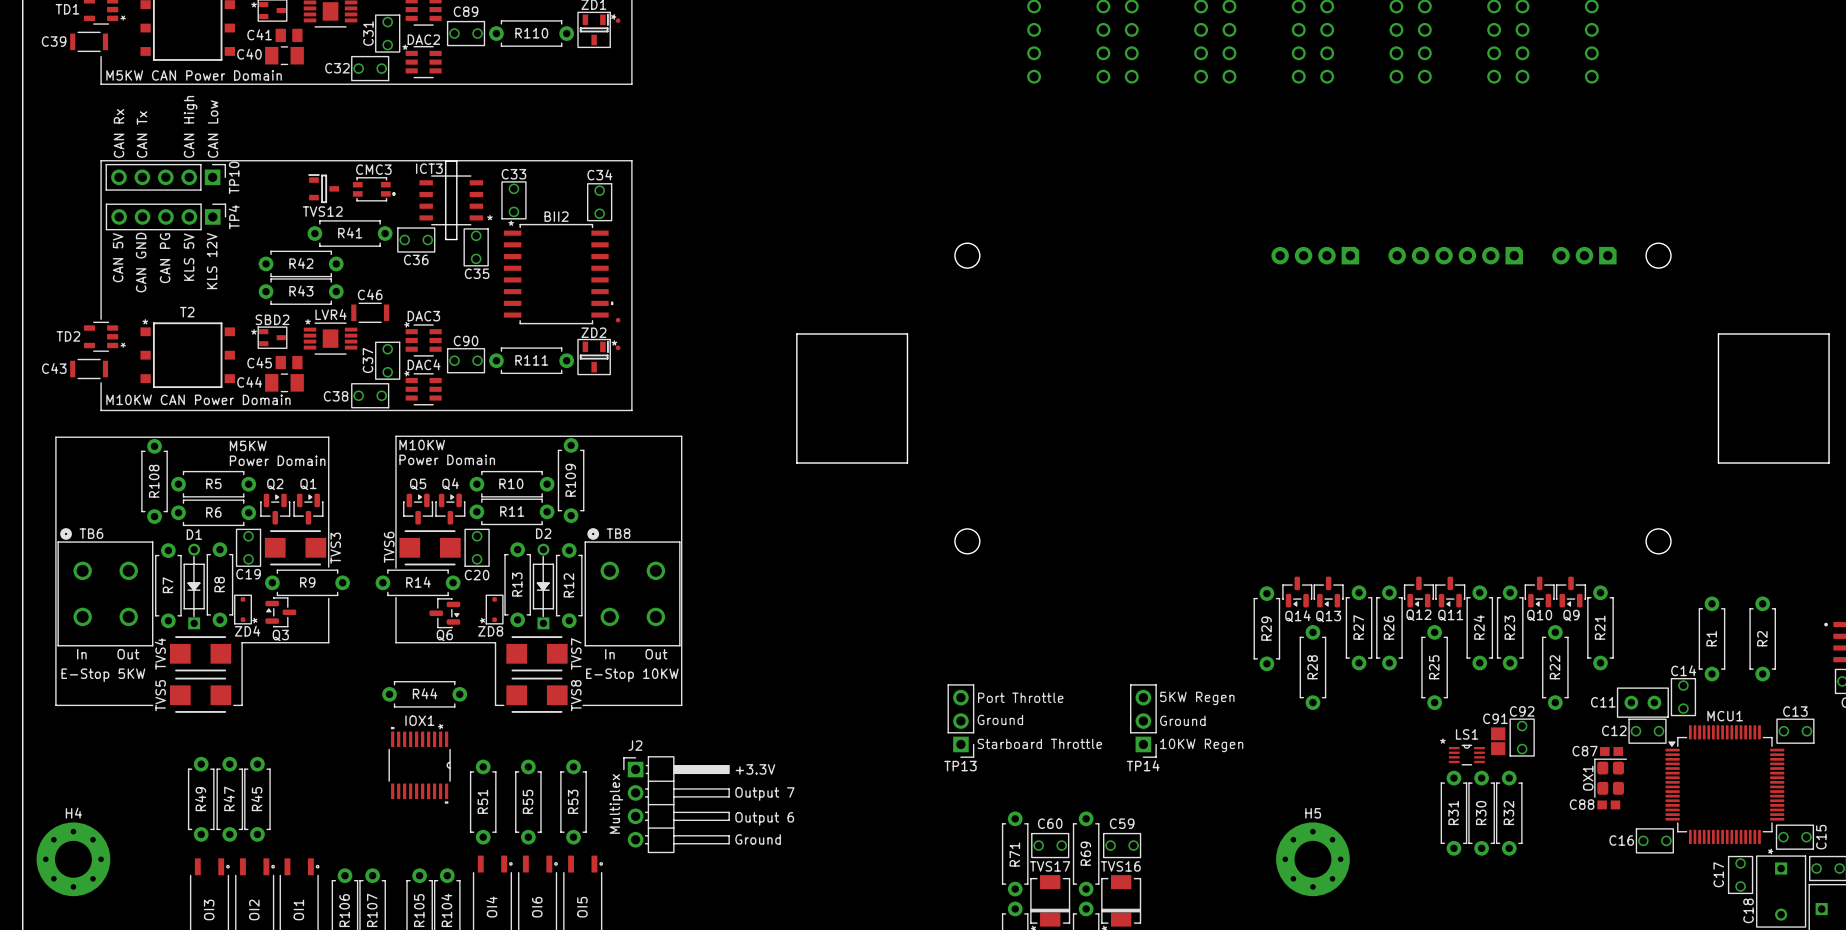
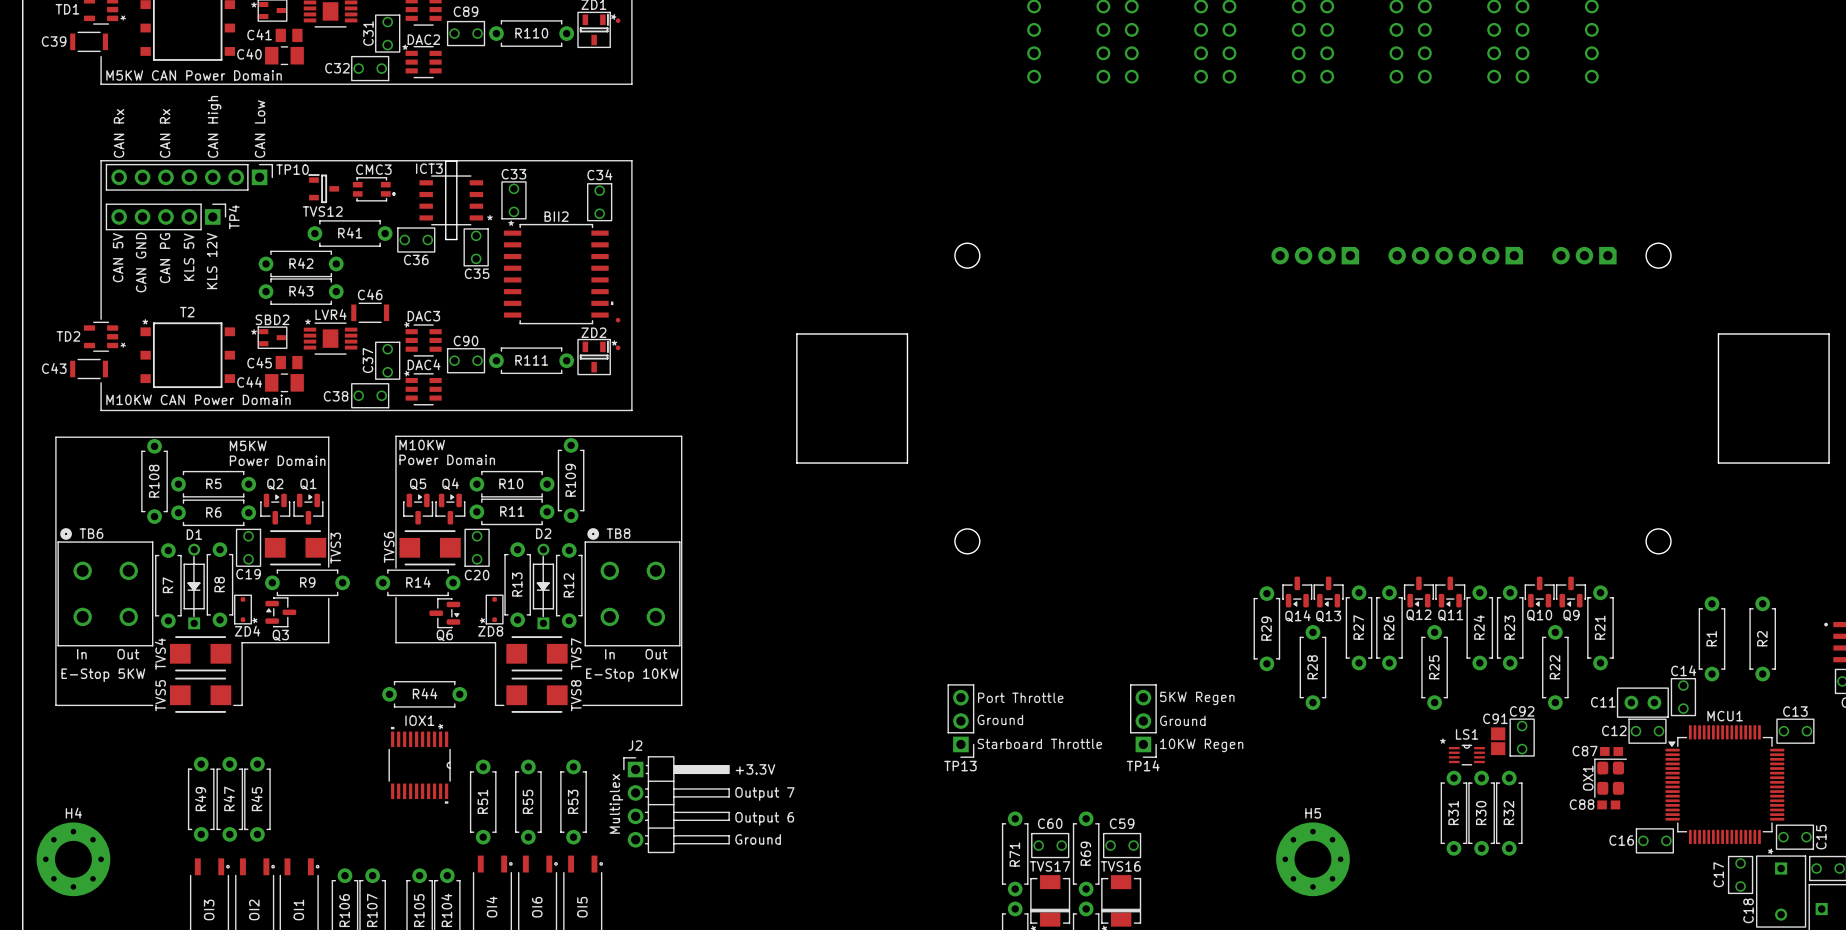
text: CAN High (190, 126) -> none
text: CAN Low (213, 129) -> CAN High (214, 126)
text: none -> CAN Low (260, 129)
text: none -> CAN Rx (165, 133)
text: CAN Tx (142, 134) -> none
TP10 footprint: [105, 164, 226, 191] -> [105, 164, 273, 191]
TP10 name position: TP10 (234, 177) -> TP10 (292, 169)

